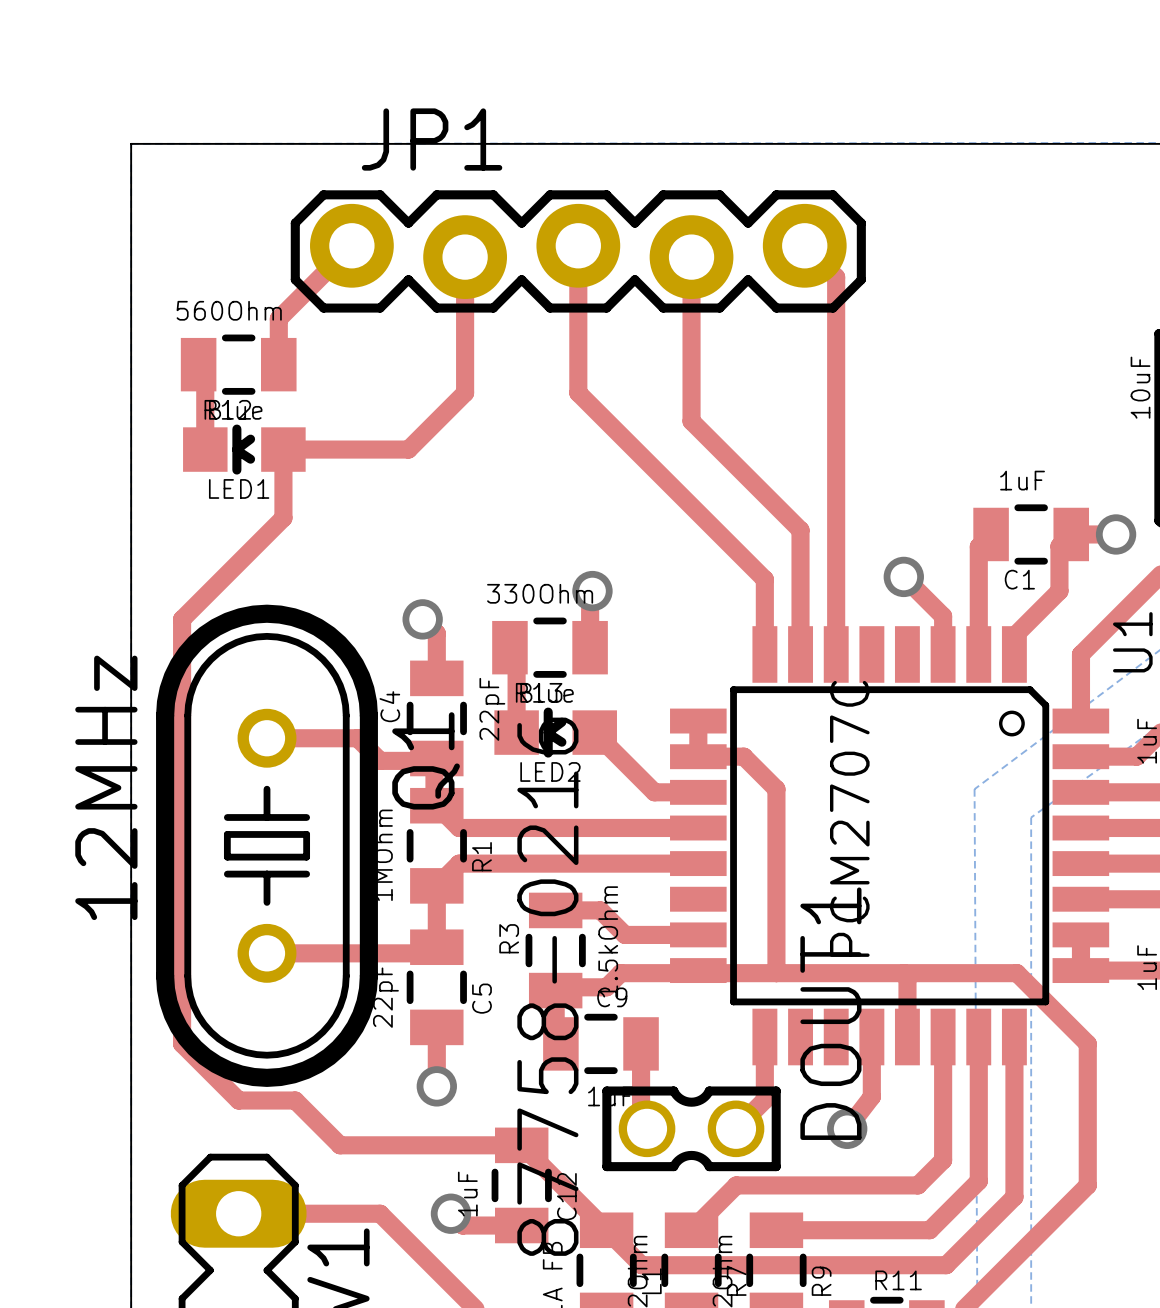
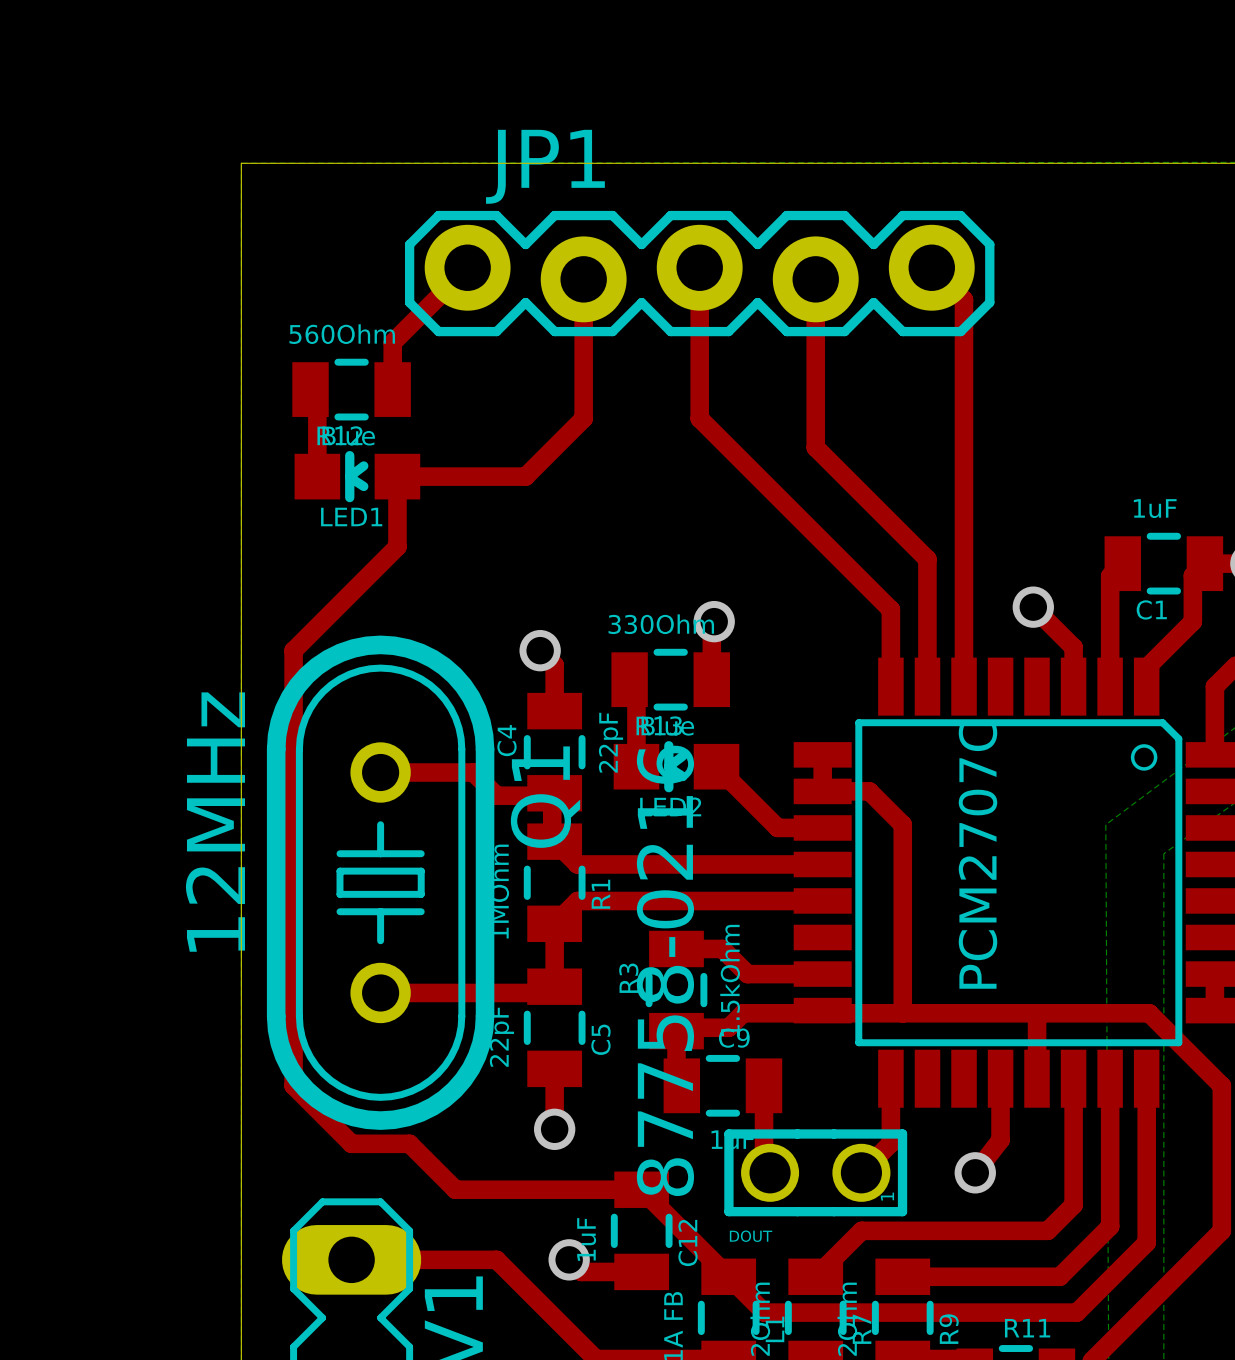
DOUT1: 87758-0216 (691, 1128) -> none
DOUT: none -> 87758-0216 (815, 1172)

